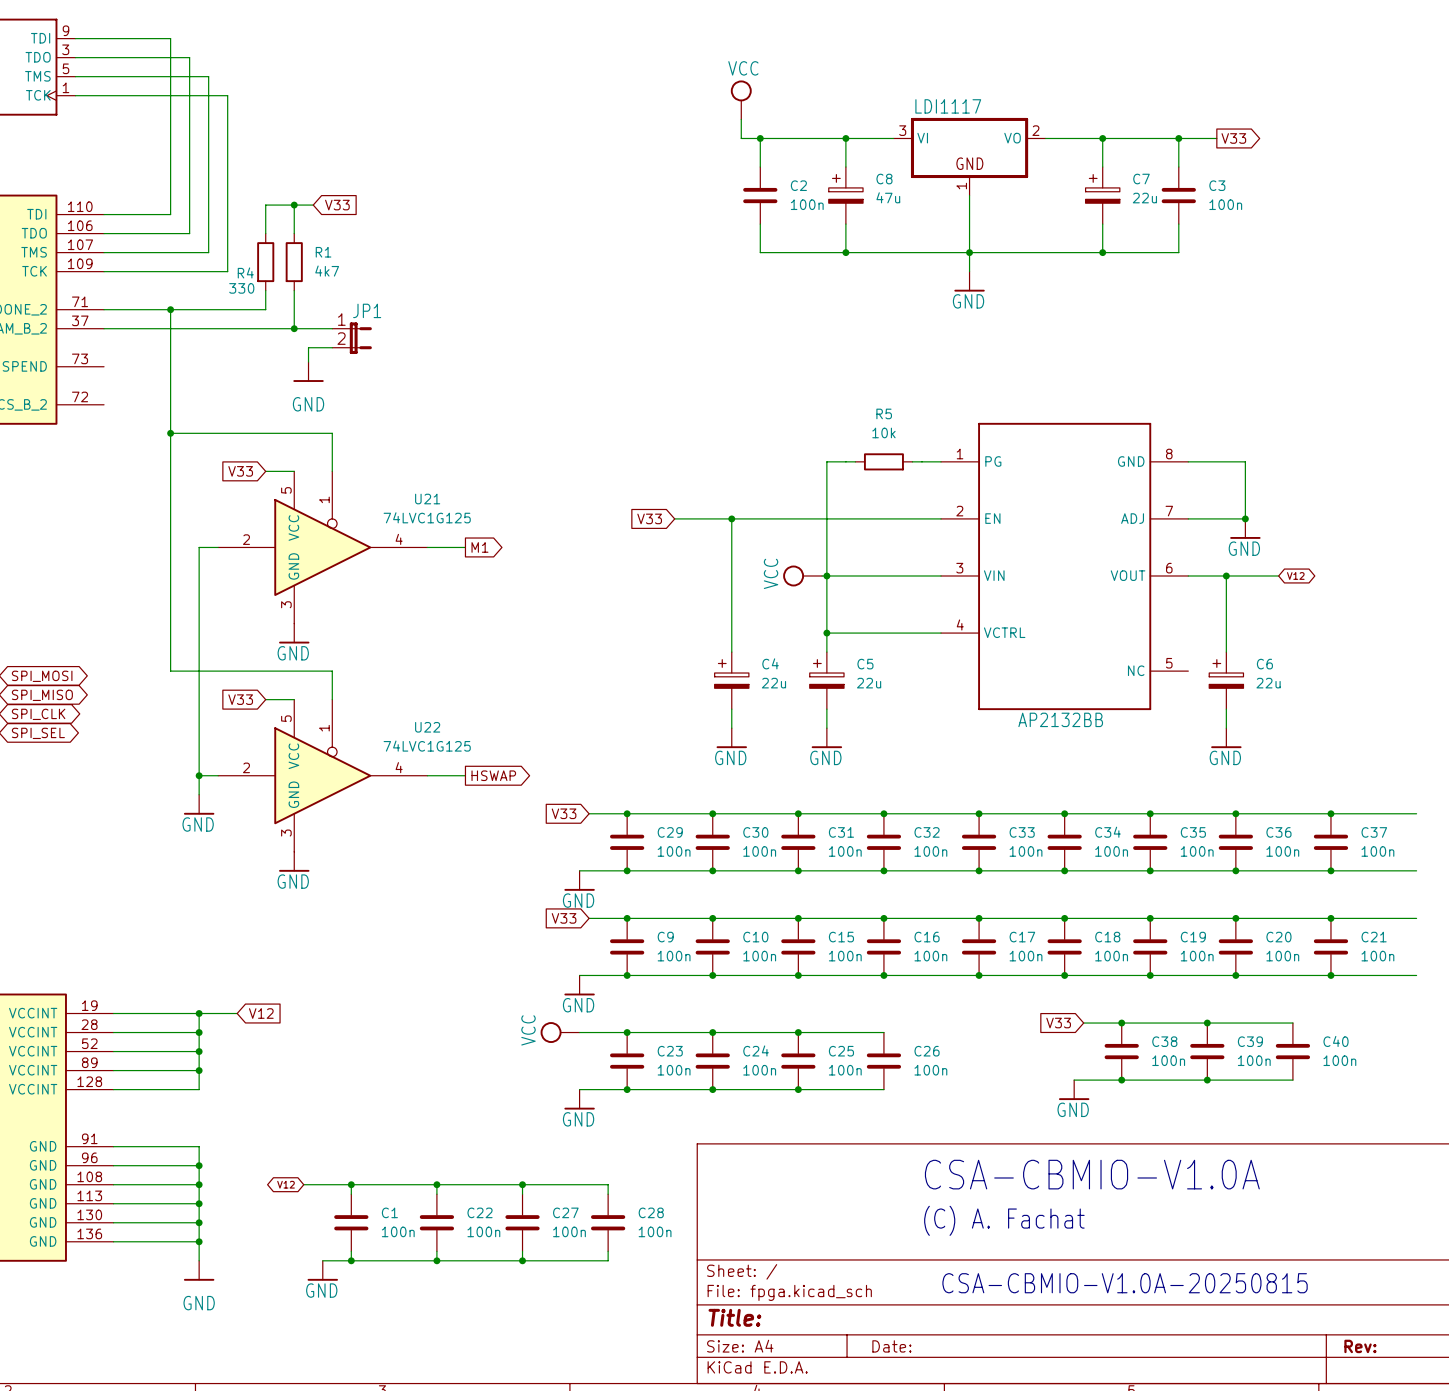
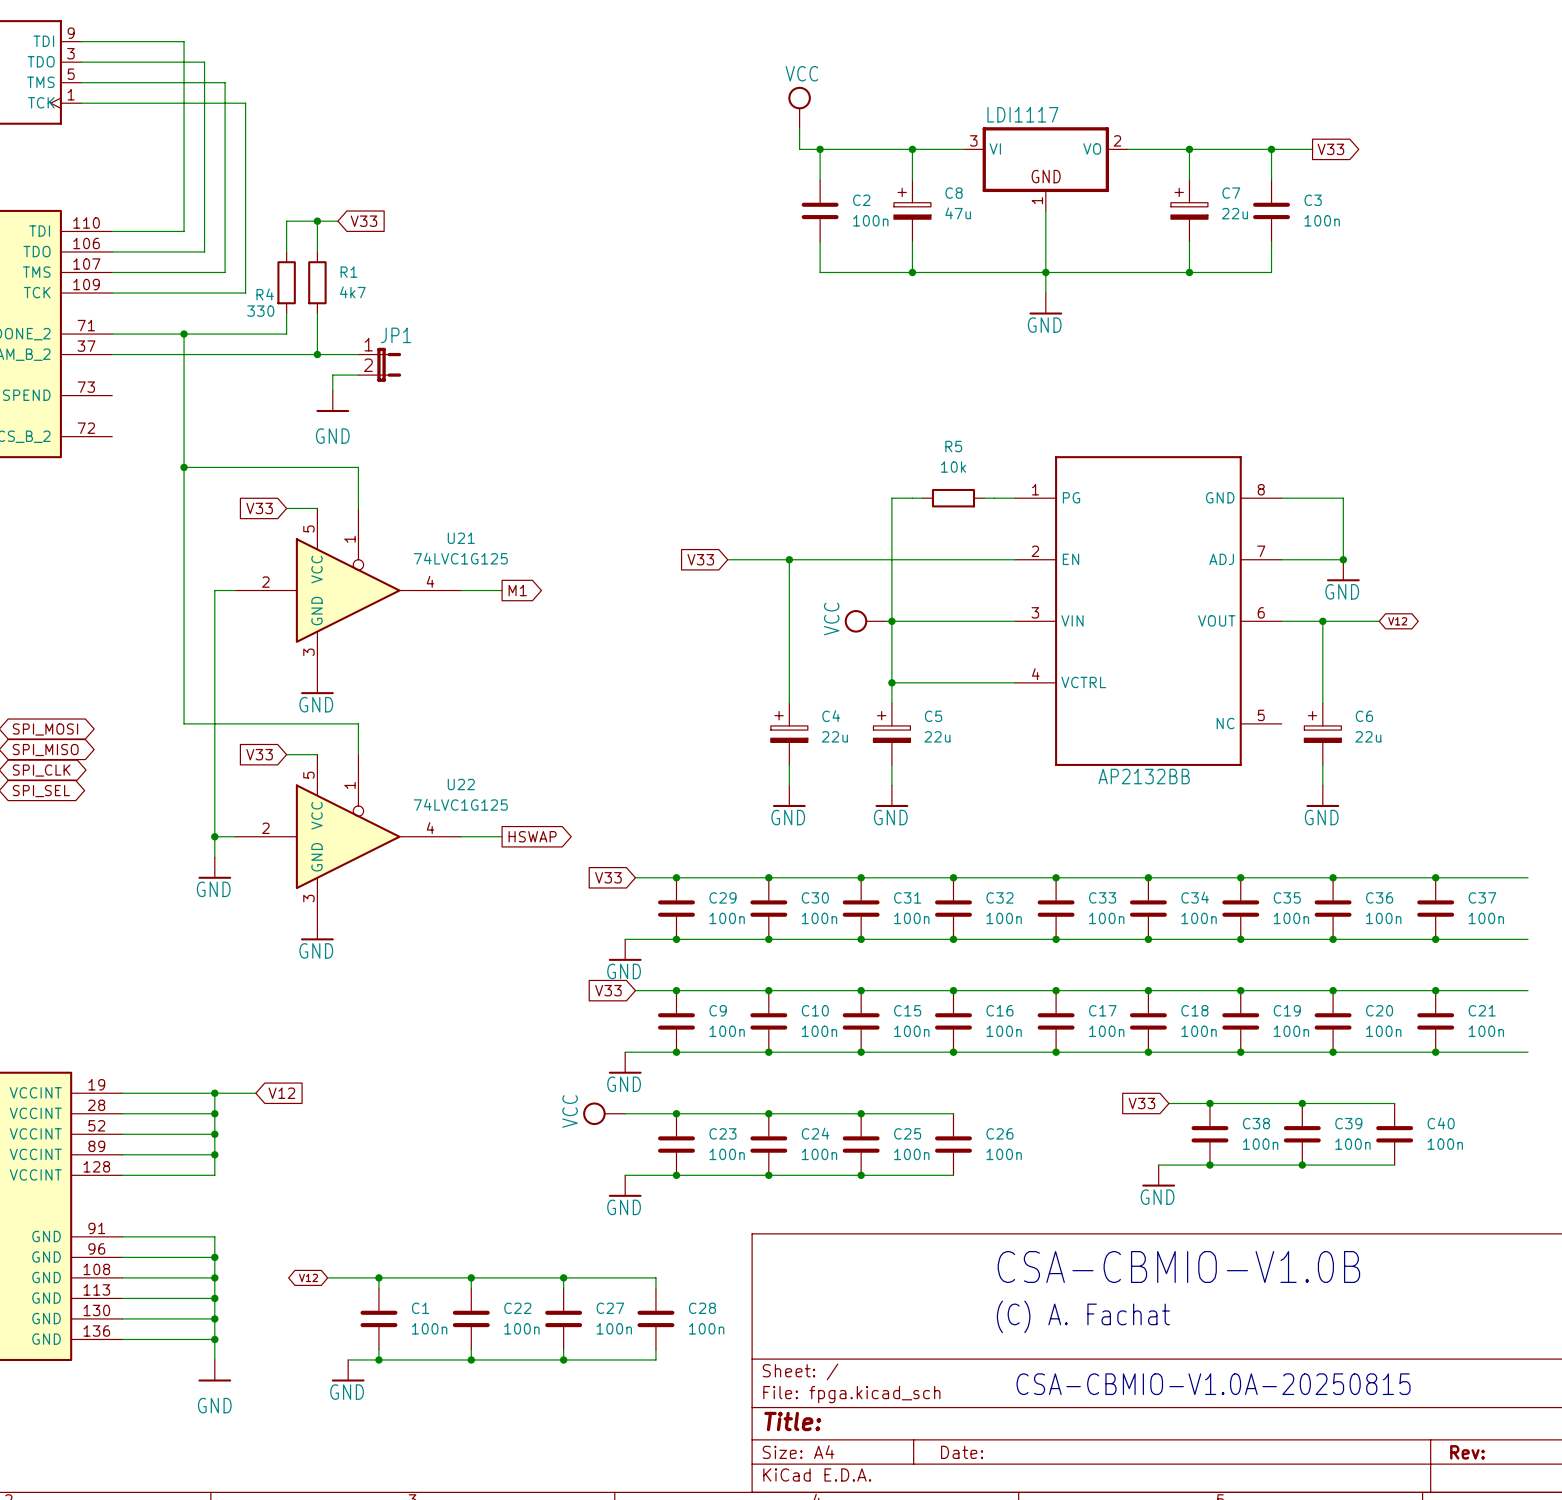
text: CSA-CBMIO-V1.0A (1092, 1174) -> CSA-CBMIO-V1.0B (1178, 1266)

